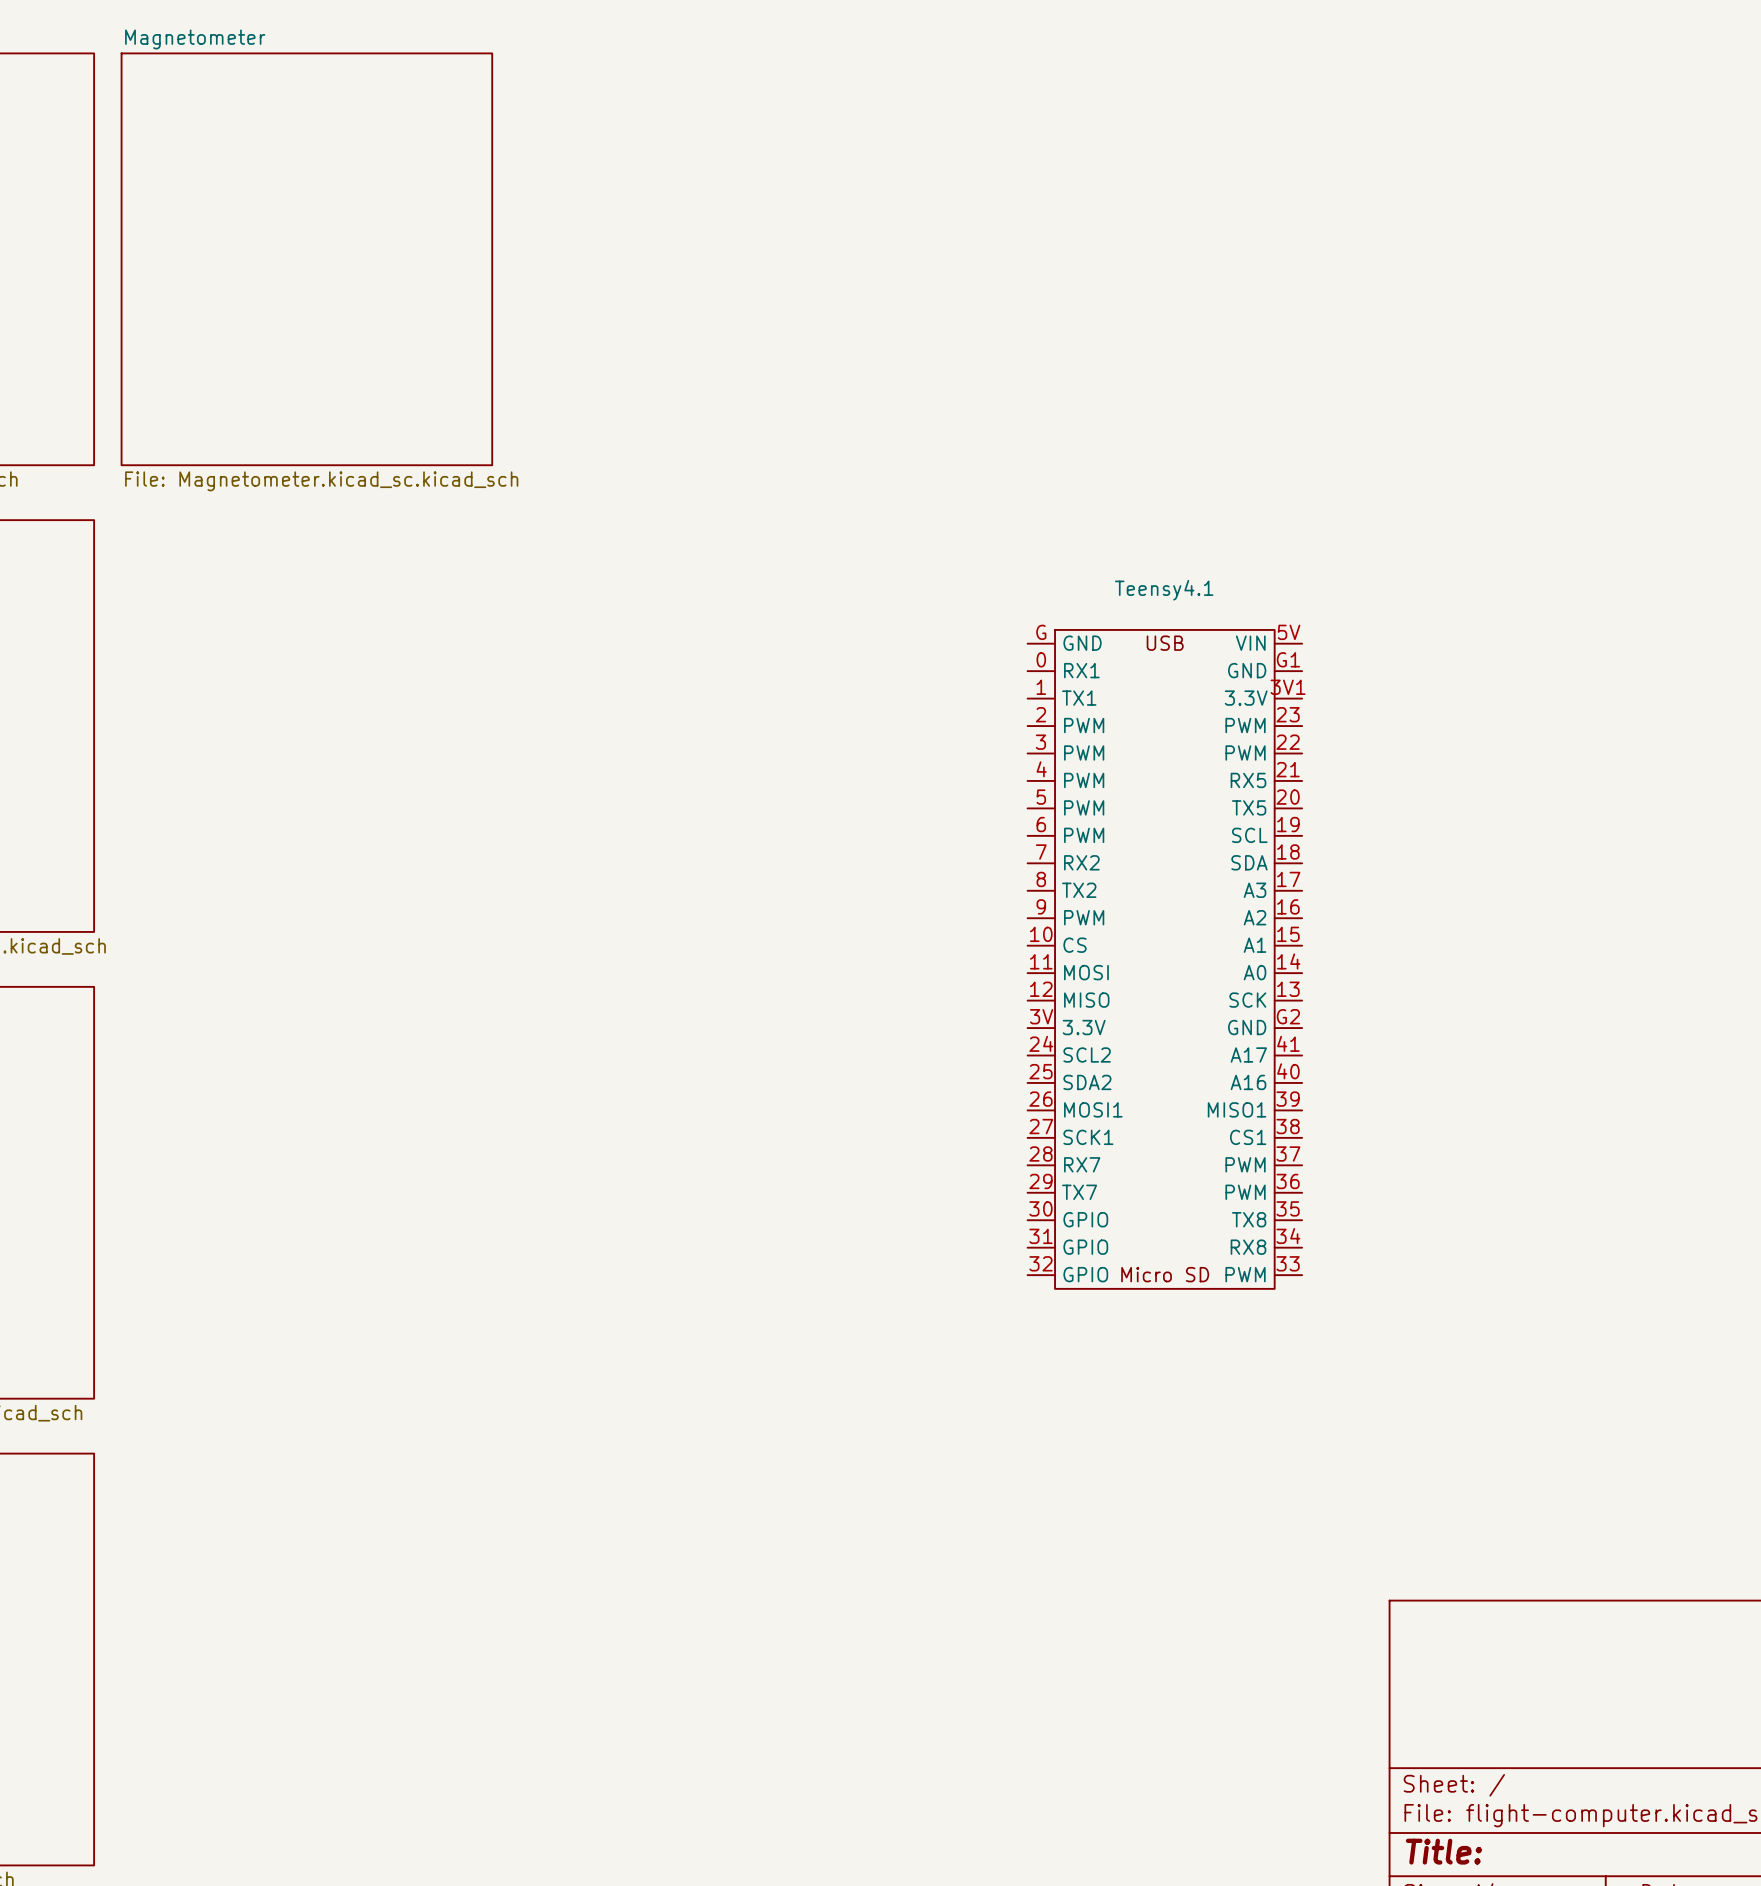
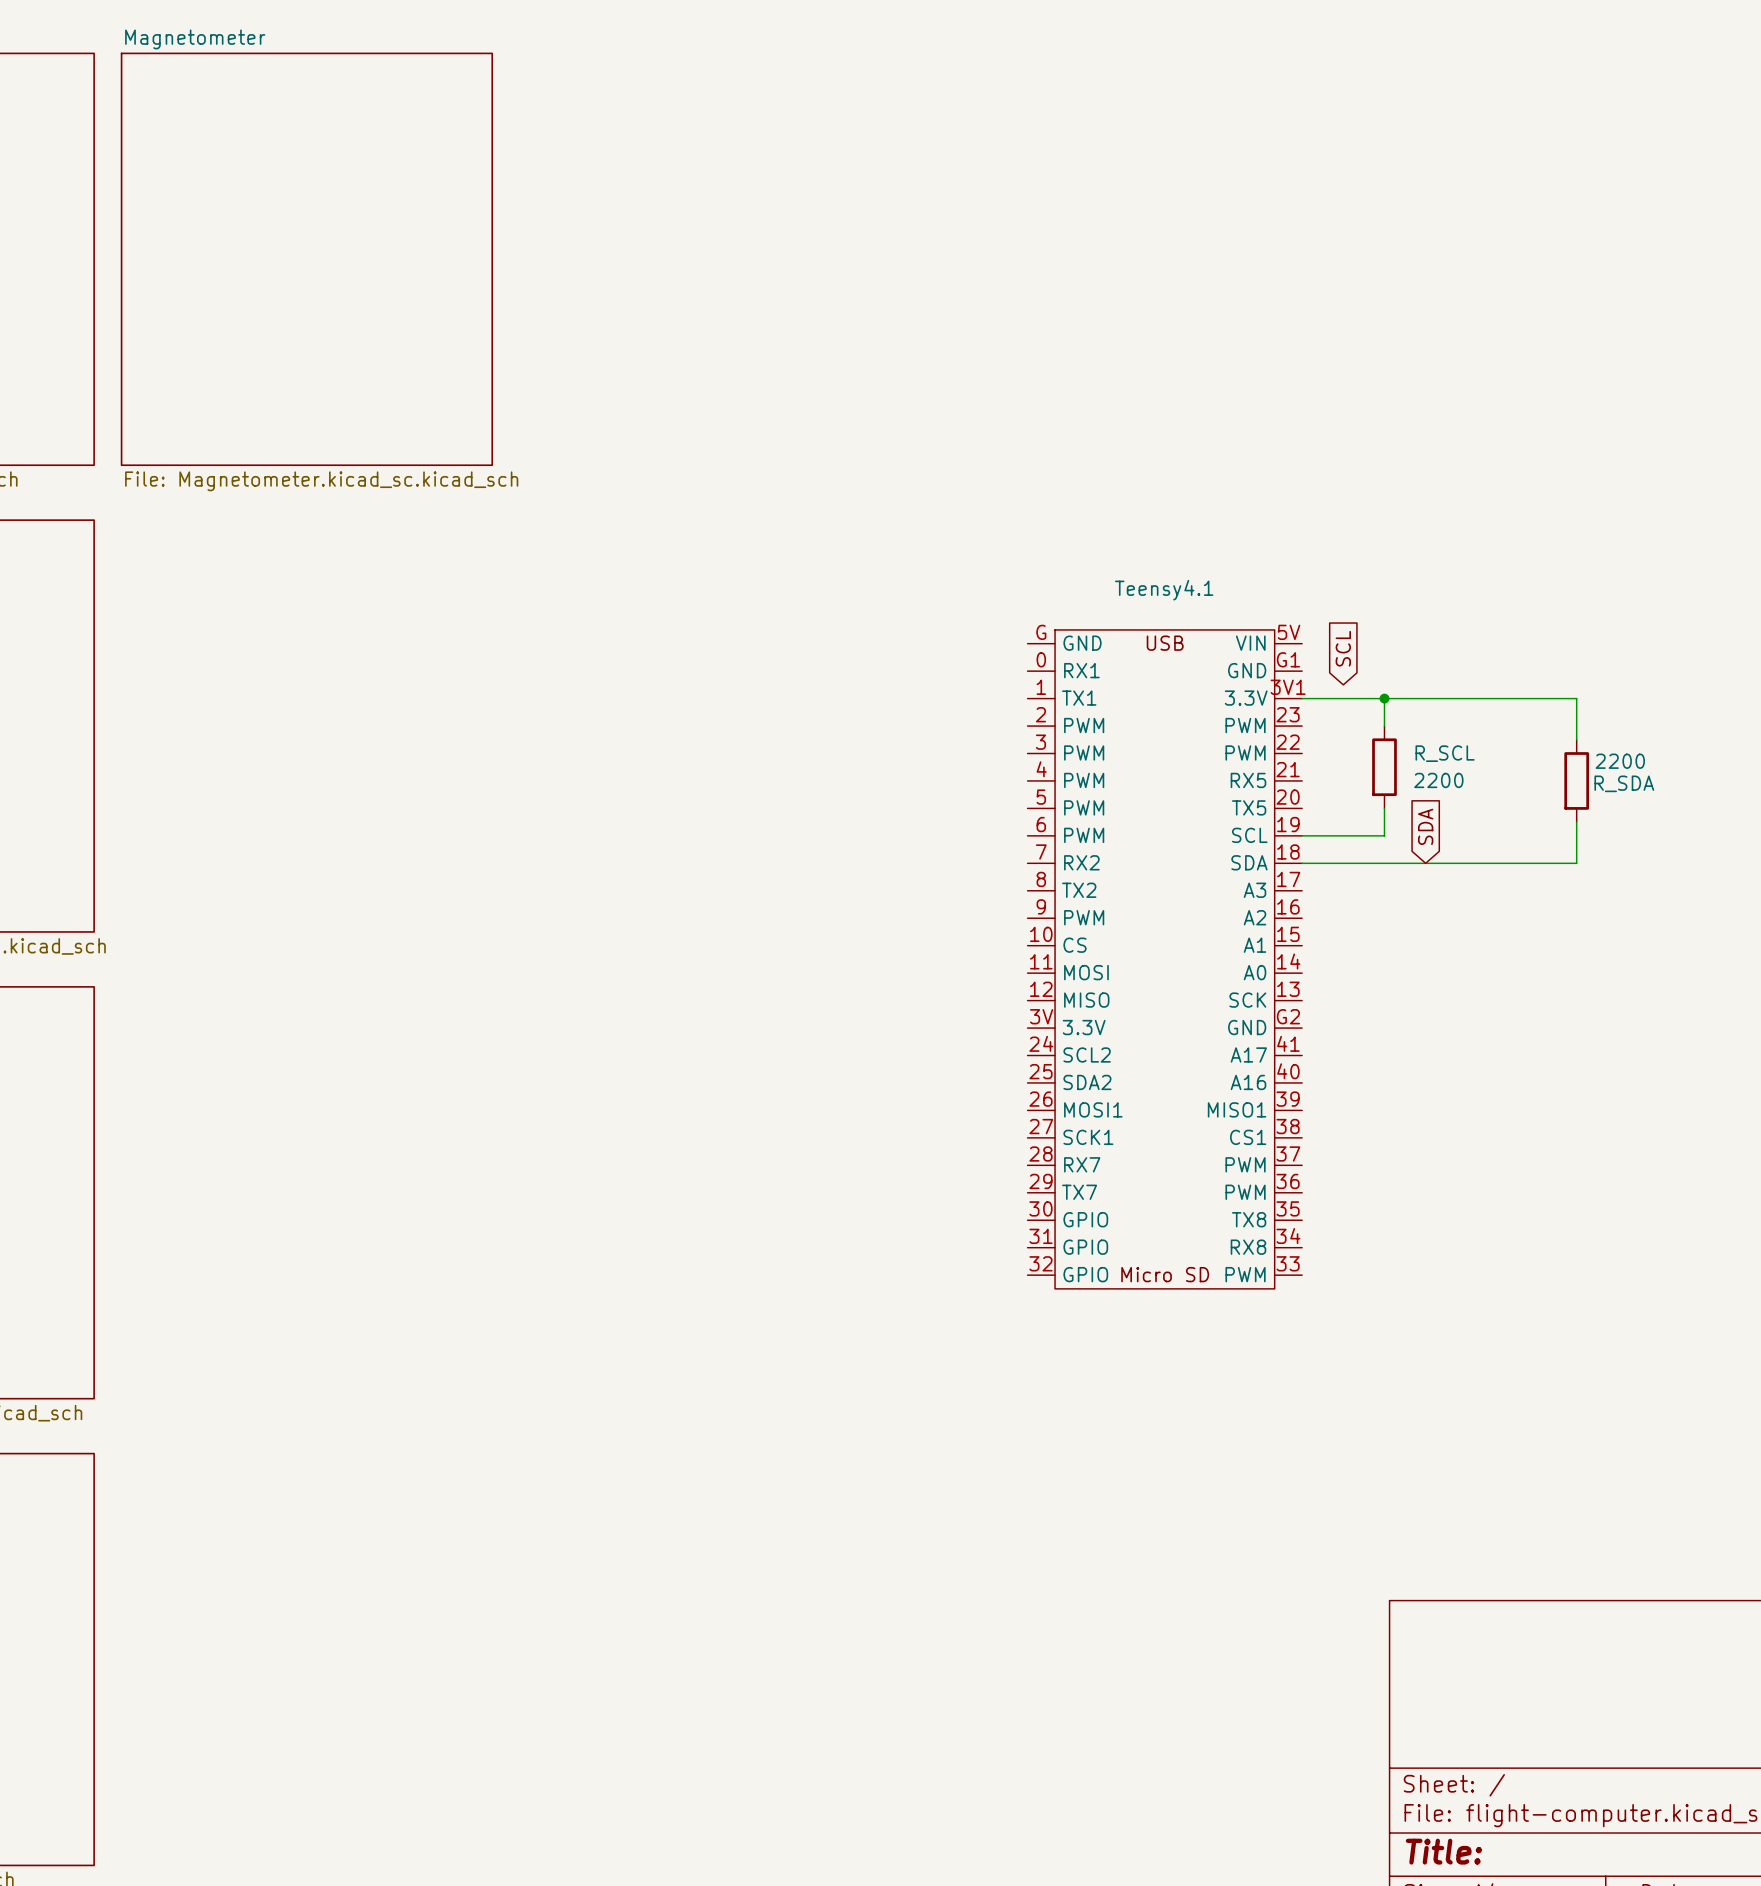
global label: none -> SCL (1343, 648)
wire: none -> (1302, 698) (1576, 698) (1576, 739)
wire: none -> (1384, 698) (1384, 726)
junction: none -> (1384, 698)
R_SCL: none -> 2200 (1384, 767)
R_SDA: none -> 2200 (1576, 780)
wire: none -> (1384, 808) (1384, 835) (1302, 835)
wire: none -> (1576, 822) (1576, 863) (1302, 863)
global label: none -> SDA (1425, 826)

